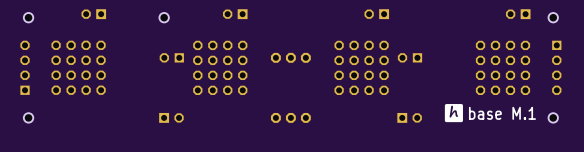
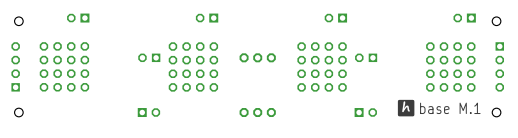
hole: (164, 17) -> none

